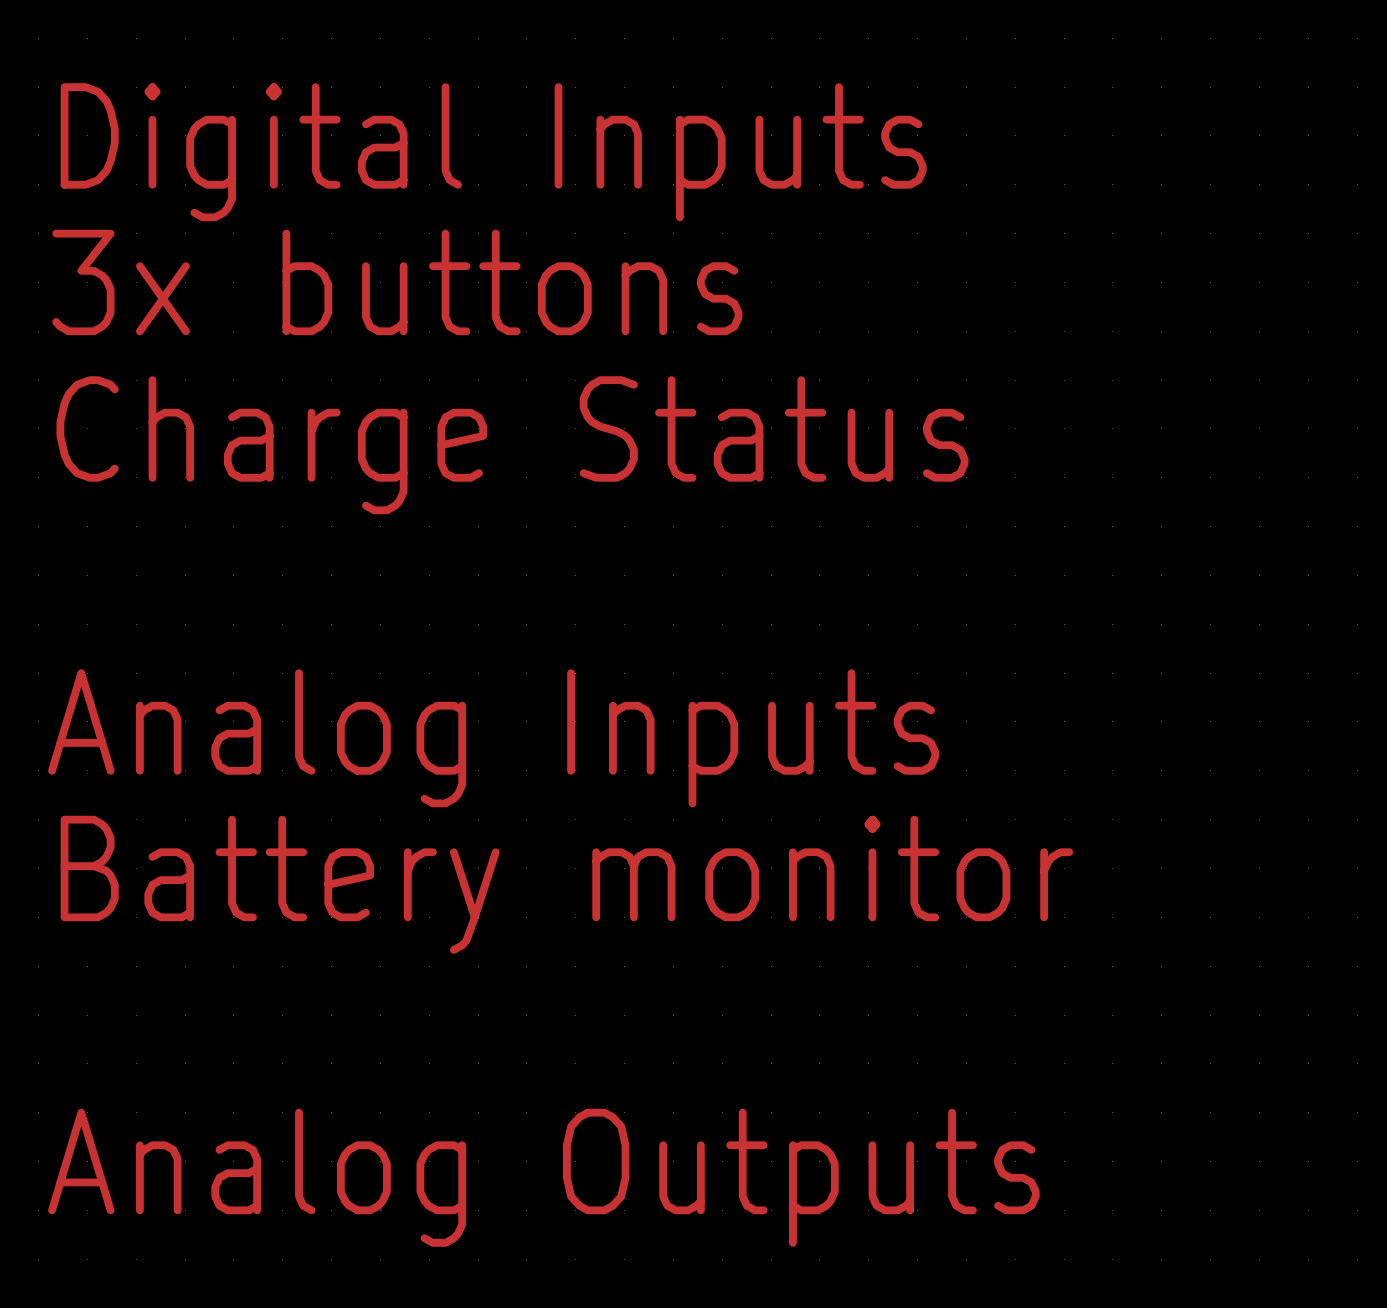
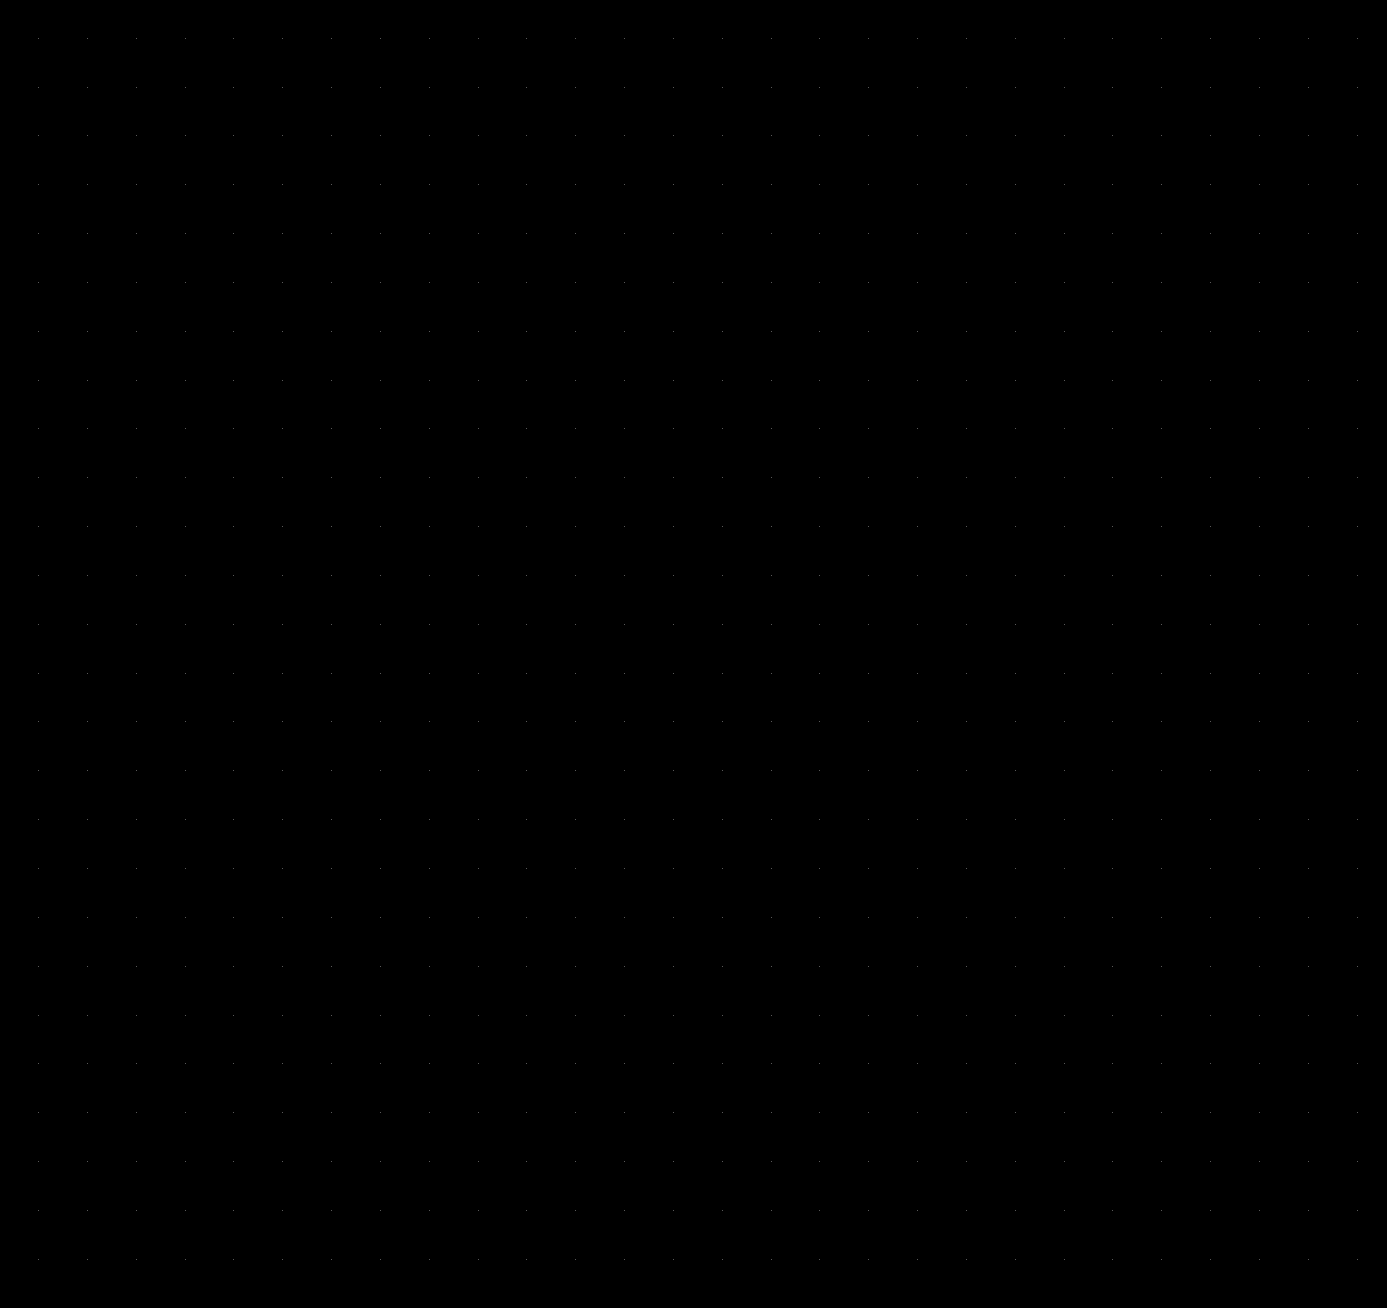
text: Digital Inputs (493, 152) -> none
text: 3x buttons (397, 282) -> none
text: Charge Status (512, 445) -> none
text: Analog Inputs (493, 738) -> none
text: Battery monitor (566, 884) -> none
text: Analog Outputs (543, 1177) -> none

